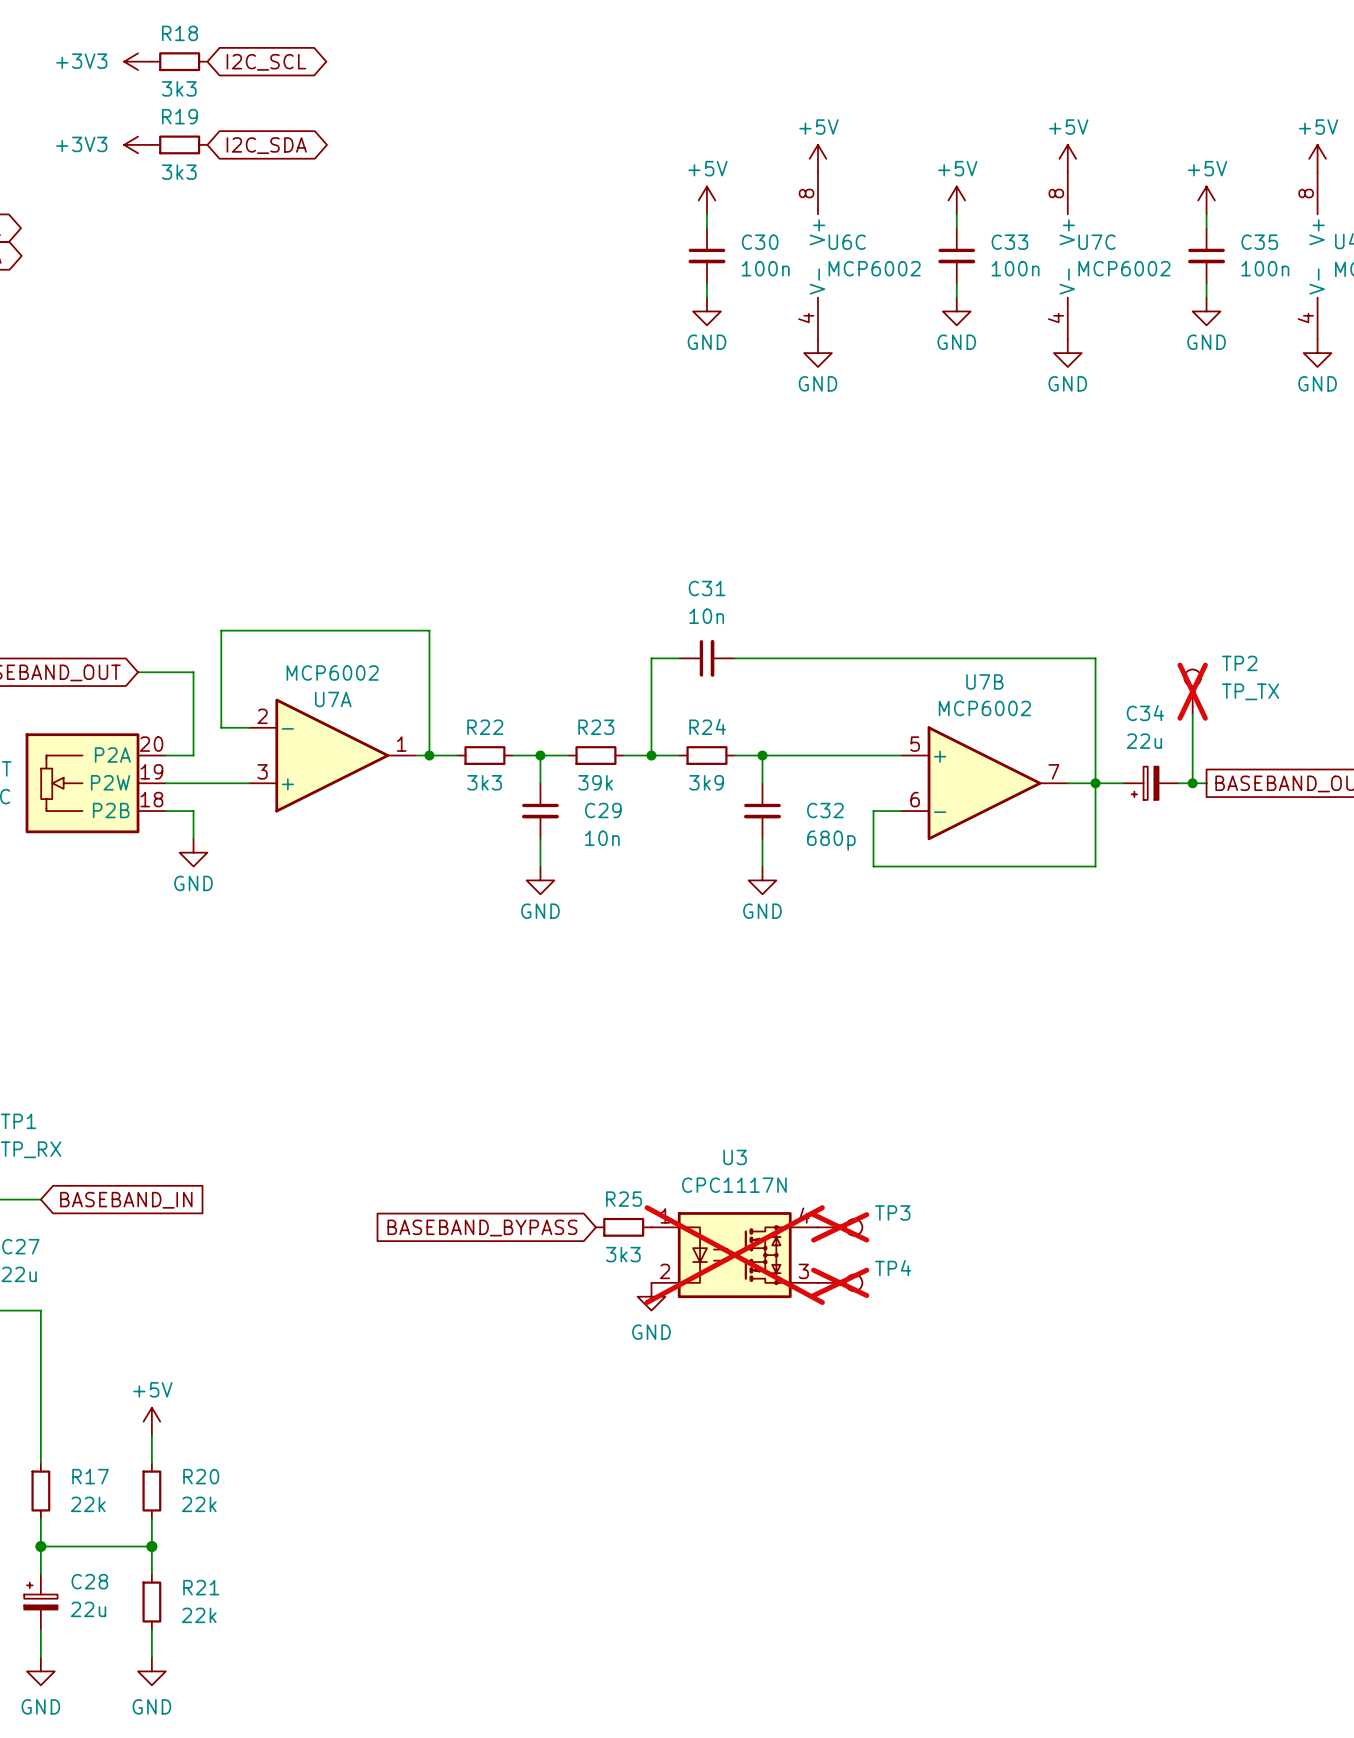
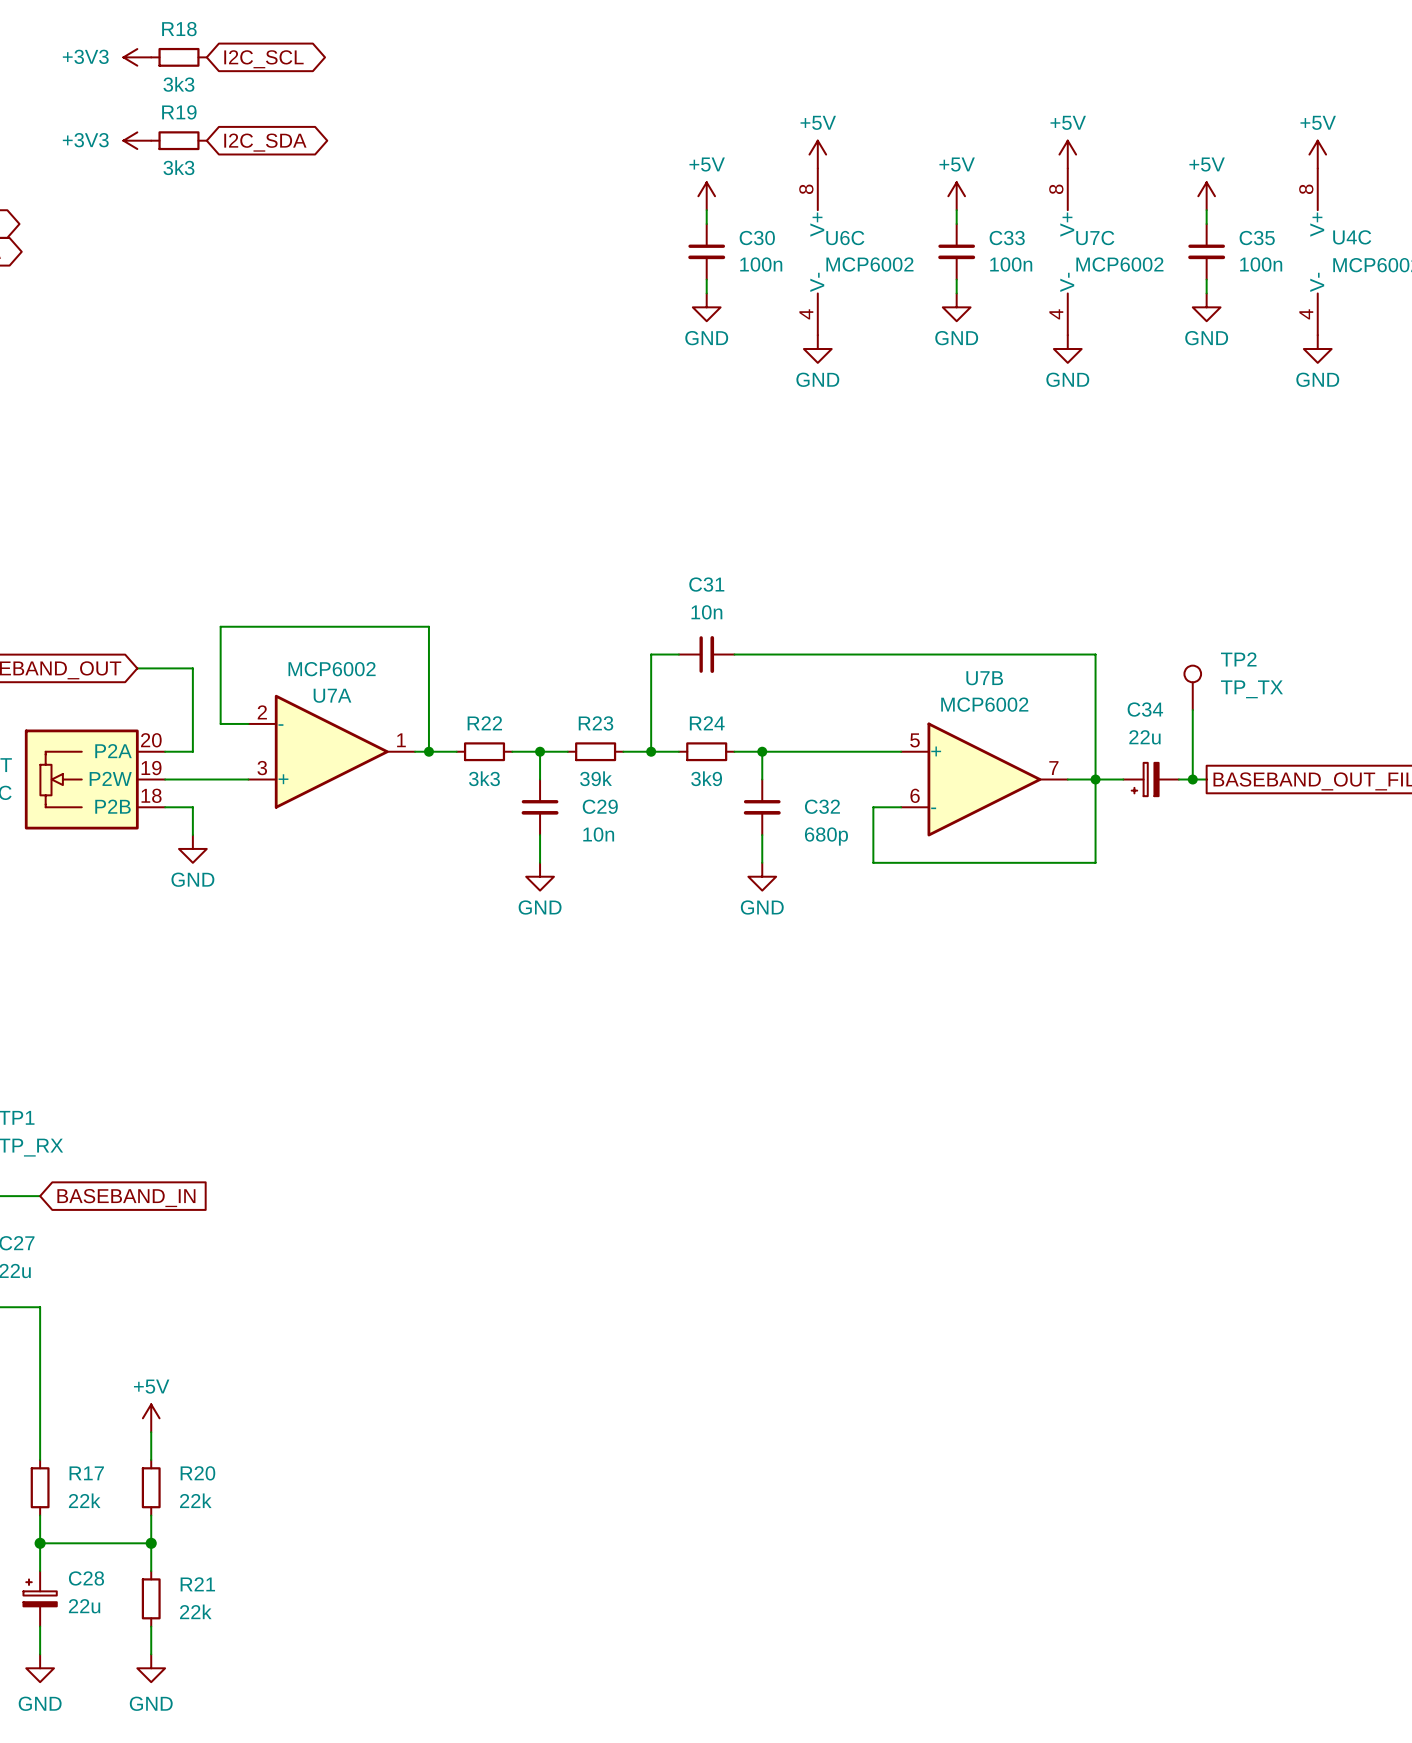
TP2 do-not-place cross: (1192, 691) -> none
R25: 3k3 (623, 1227) -> none
TP3: (840, 1227) -> none
global label: BASEBAND_BYPASS (482, 1228) -> none
U3: CPC1117N (734, 1255) -> none
TP4: (840, 1282) -> none
power symbol: GND (651, 1296) -> none

